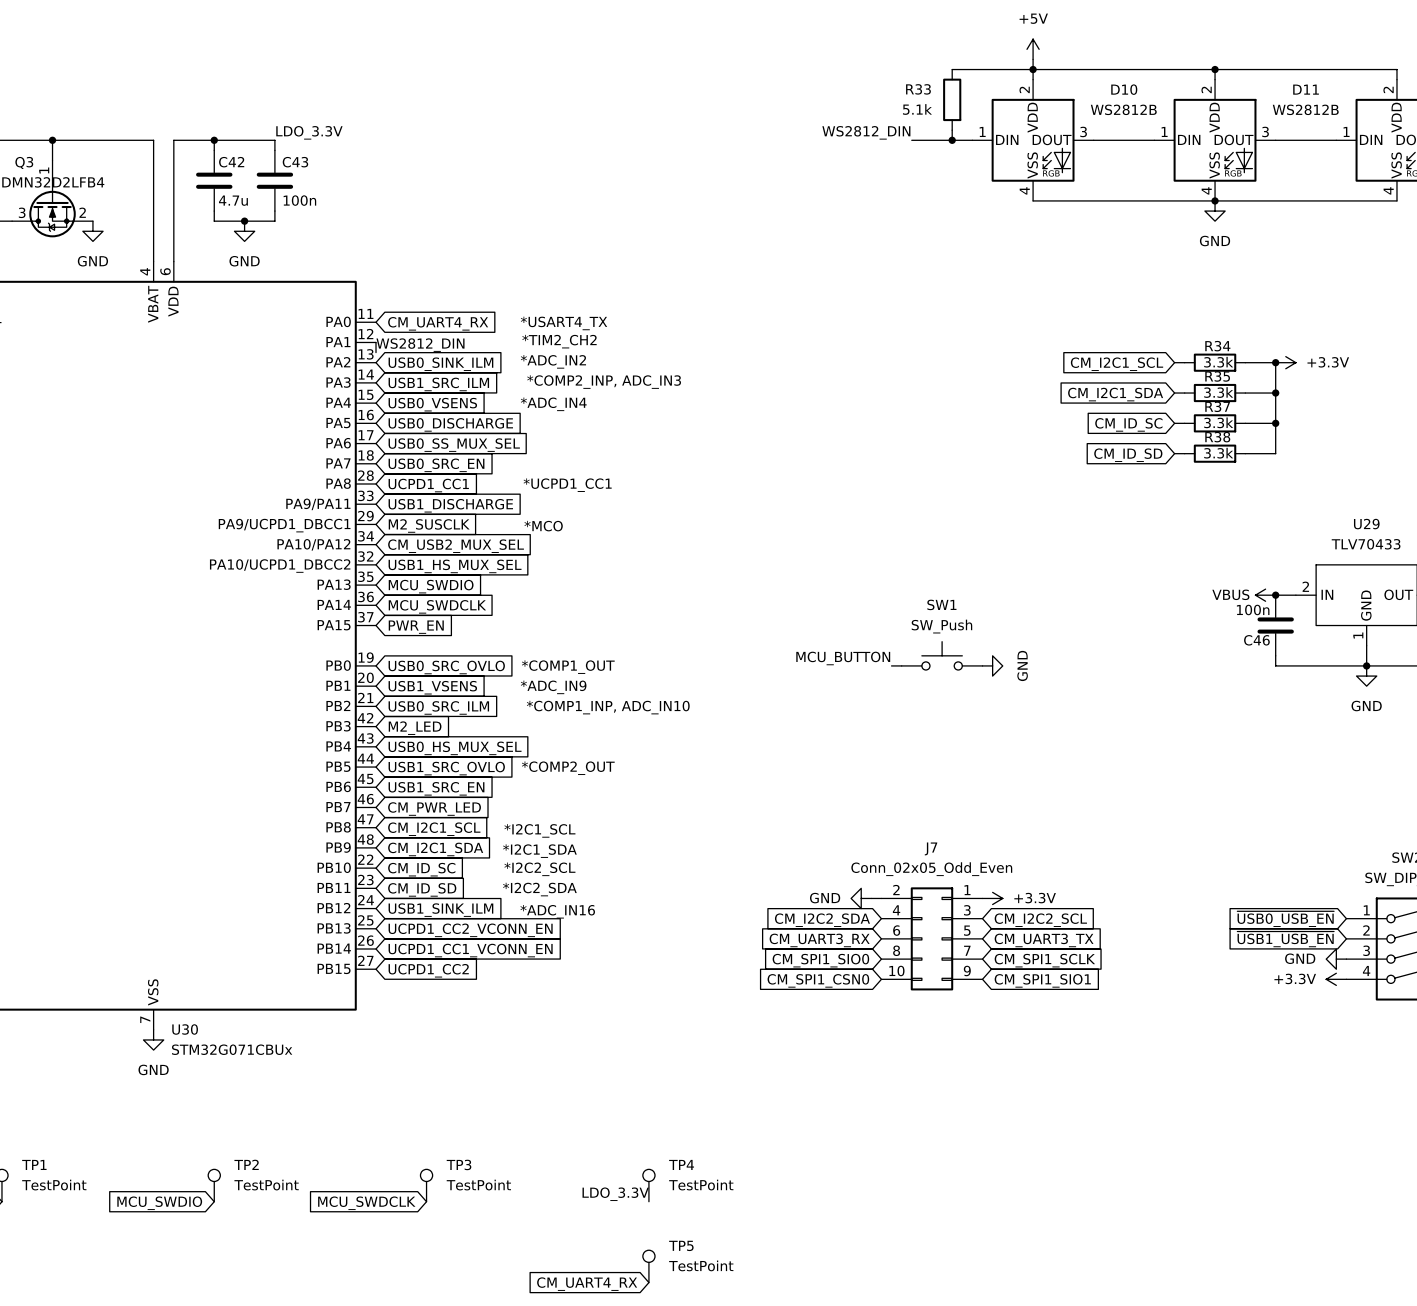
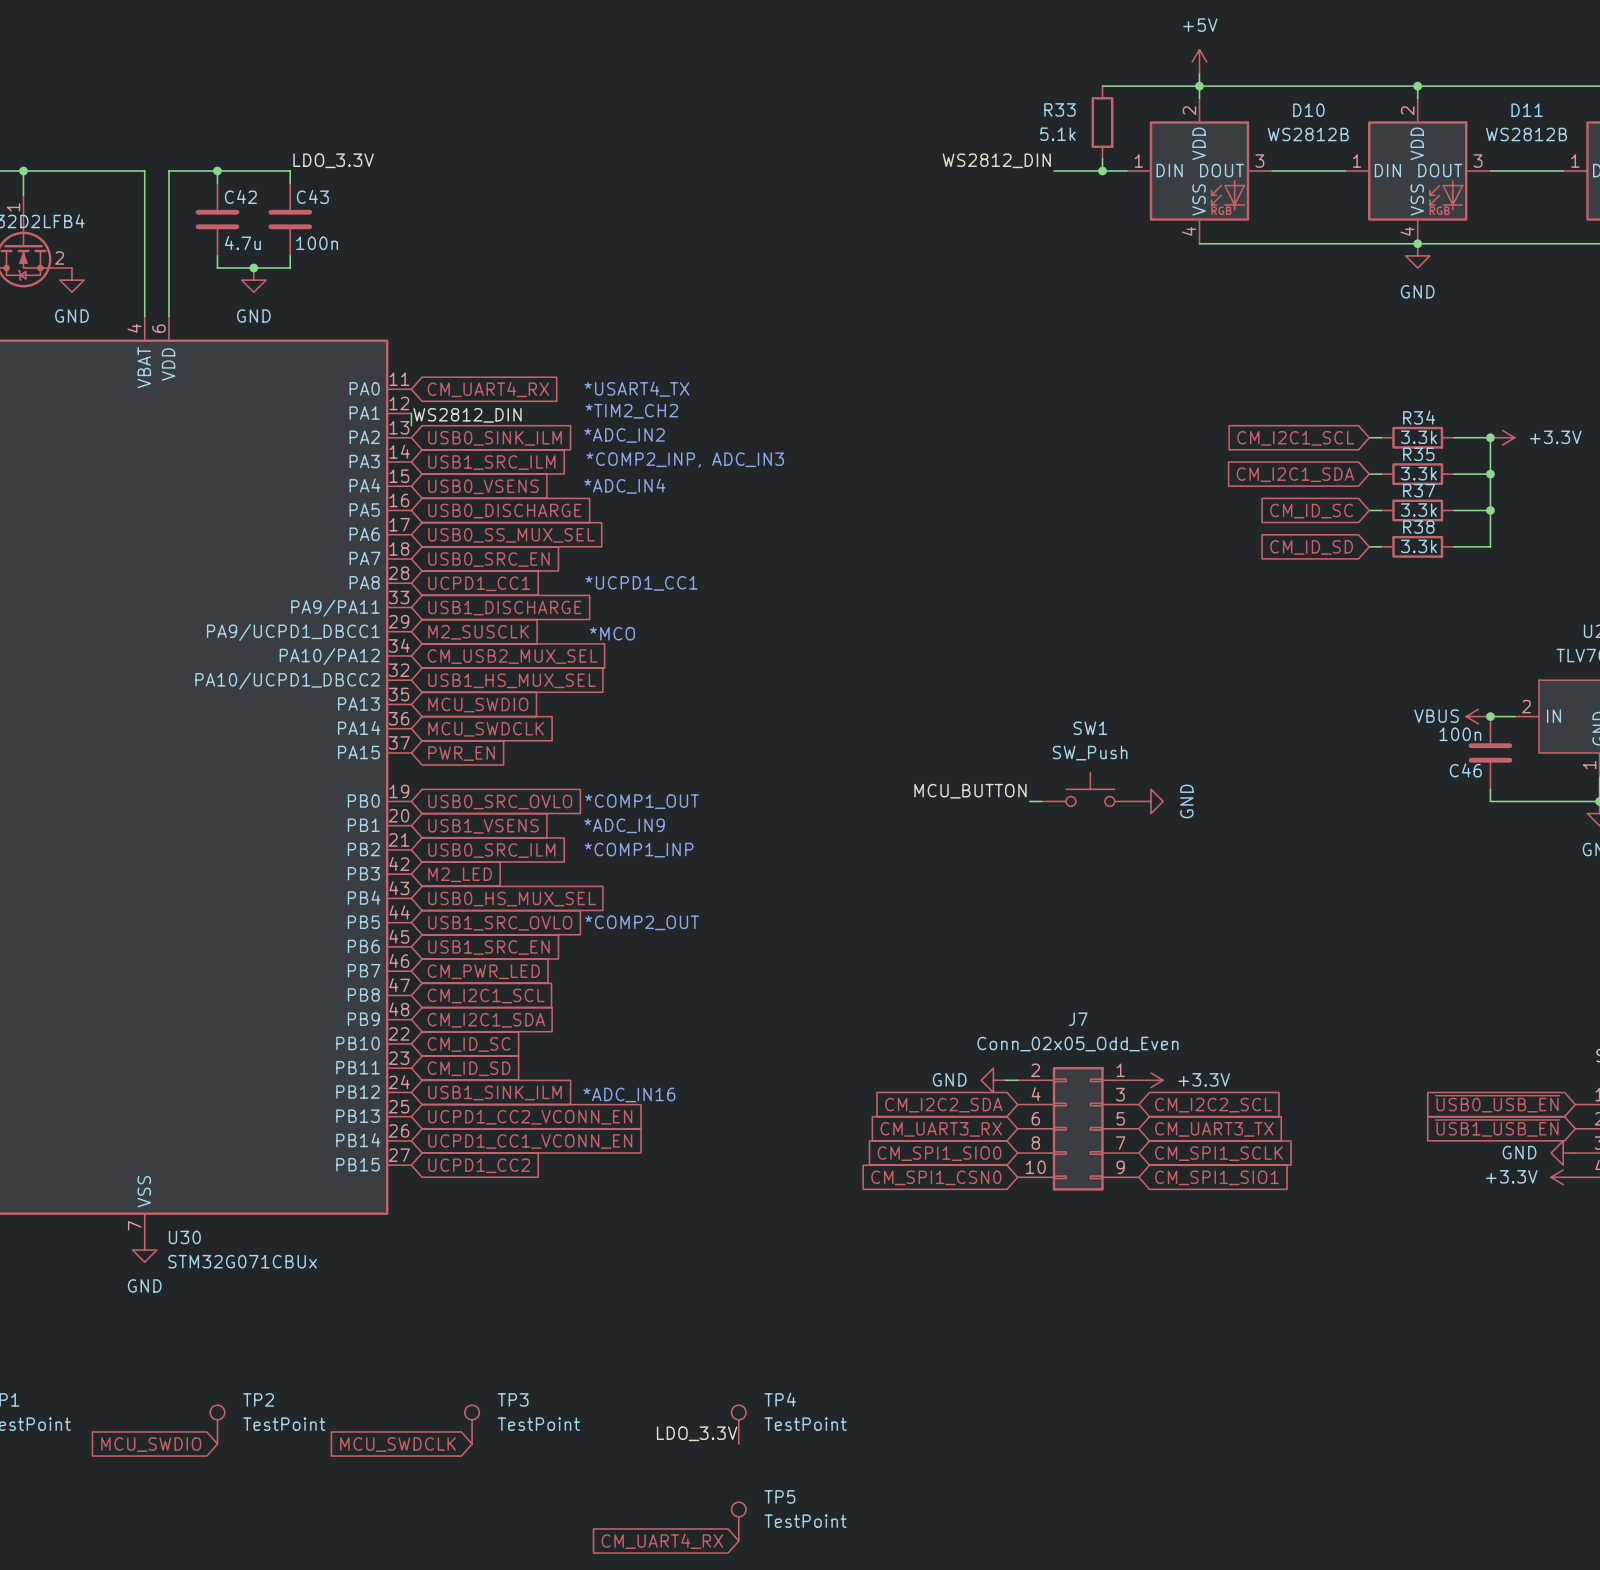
text: *COMP1_INP, ADC_IN10 (608, 707) -> *COMP1_INP (639, 850)
text: *I2C1_SCL (539, 830) -> none
text: *I2C1_SDA (539, 851) -> none
text: *I2C2_SCL (539, 869) -> none
text: *I2C2_SDA (539, 889) -> none

